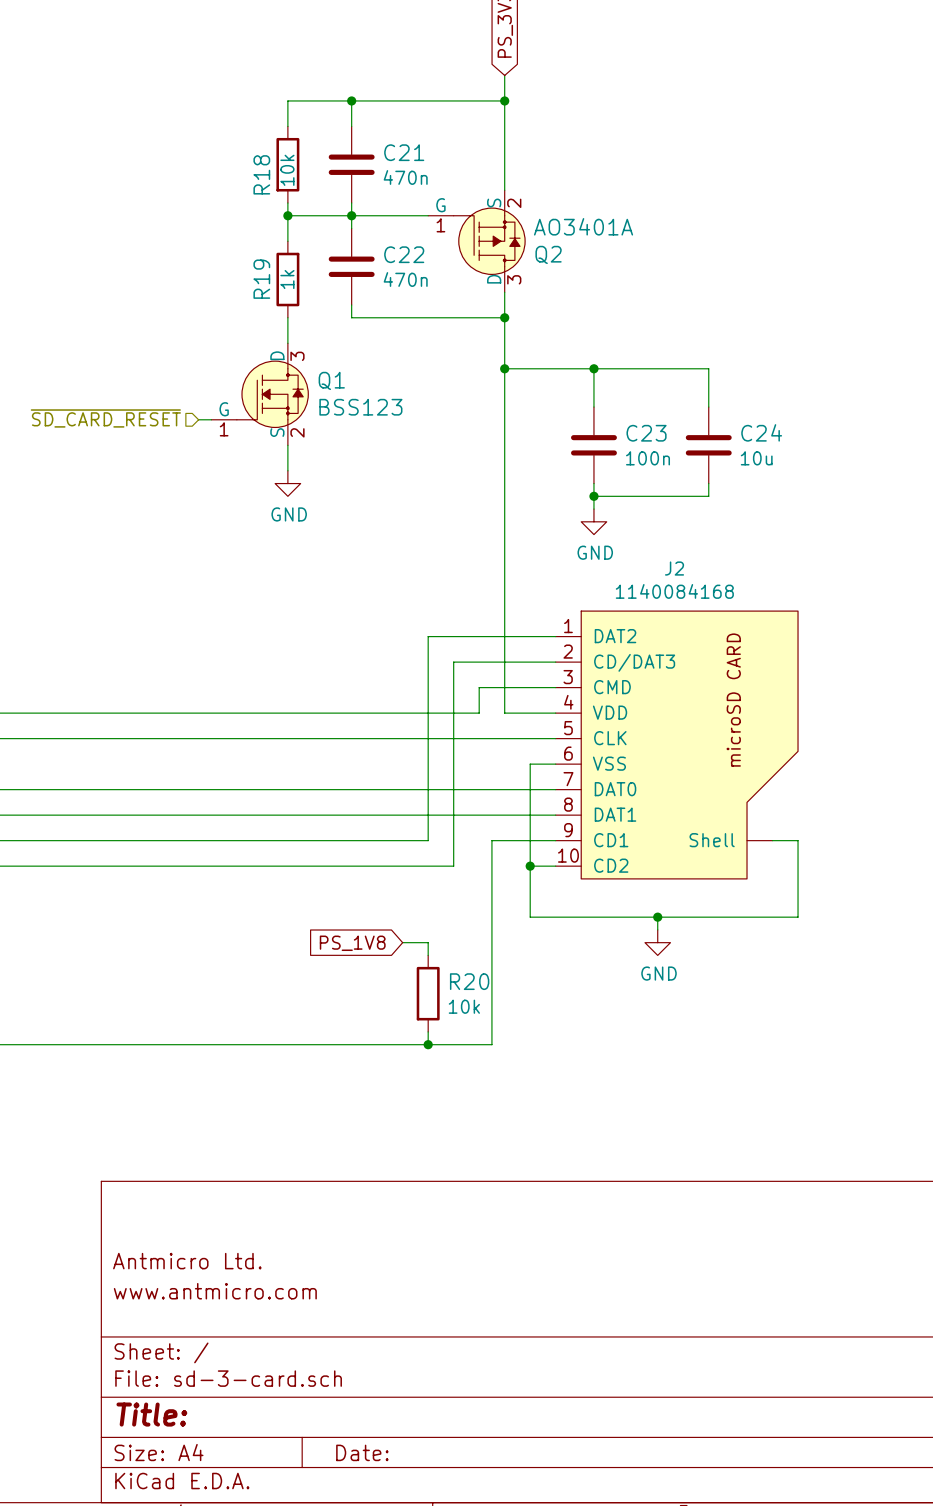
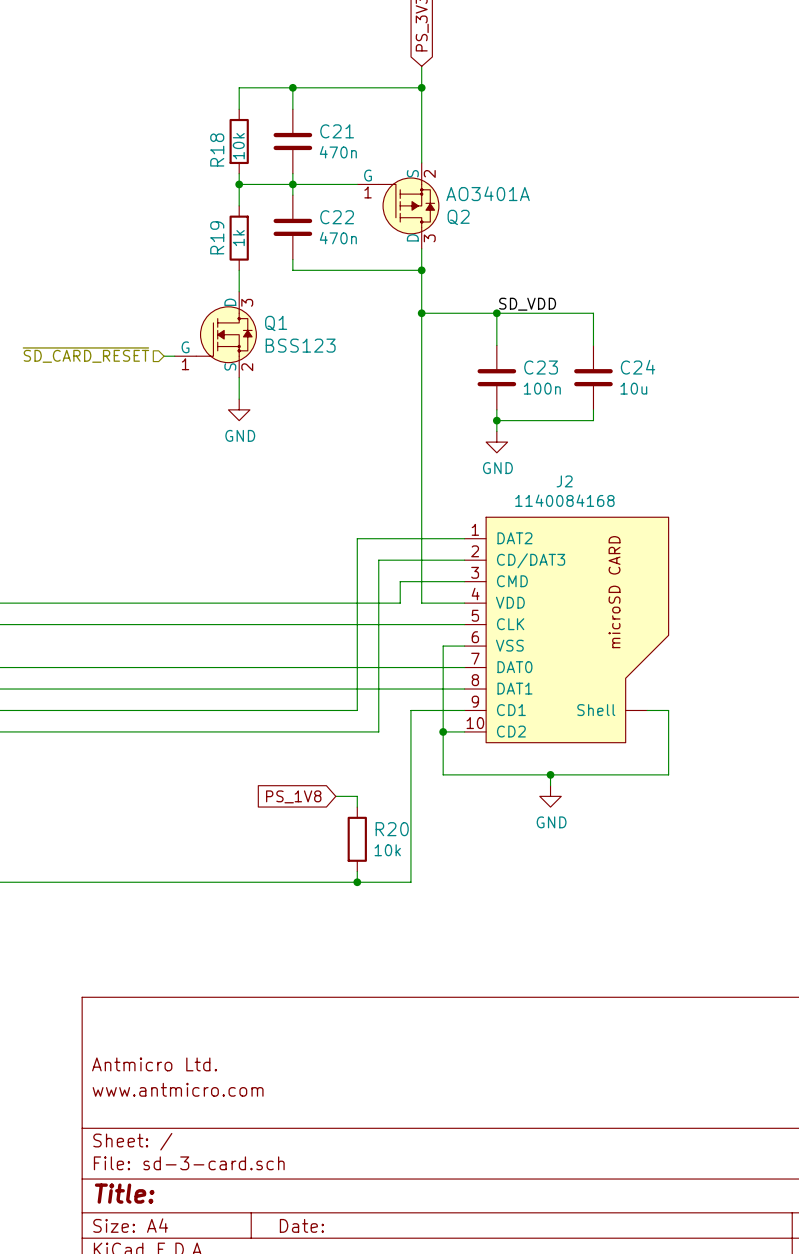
label: none -> SD_VDD (527, 304)

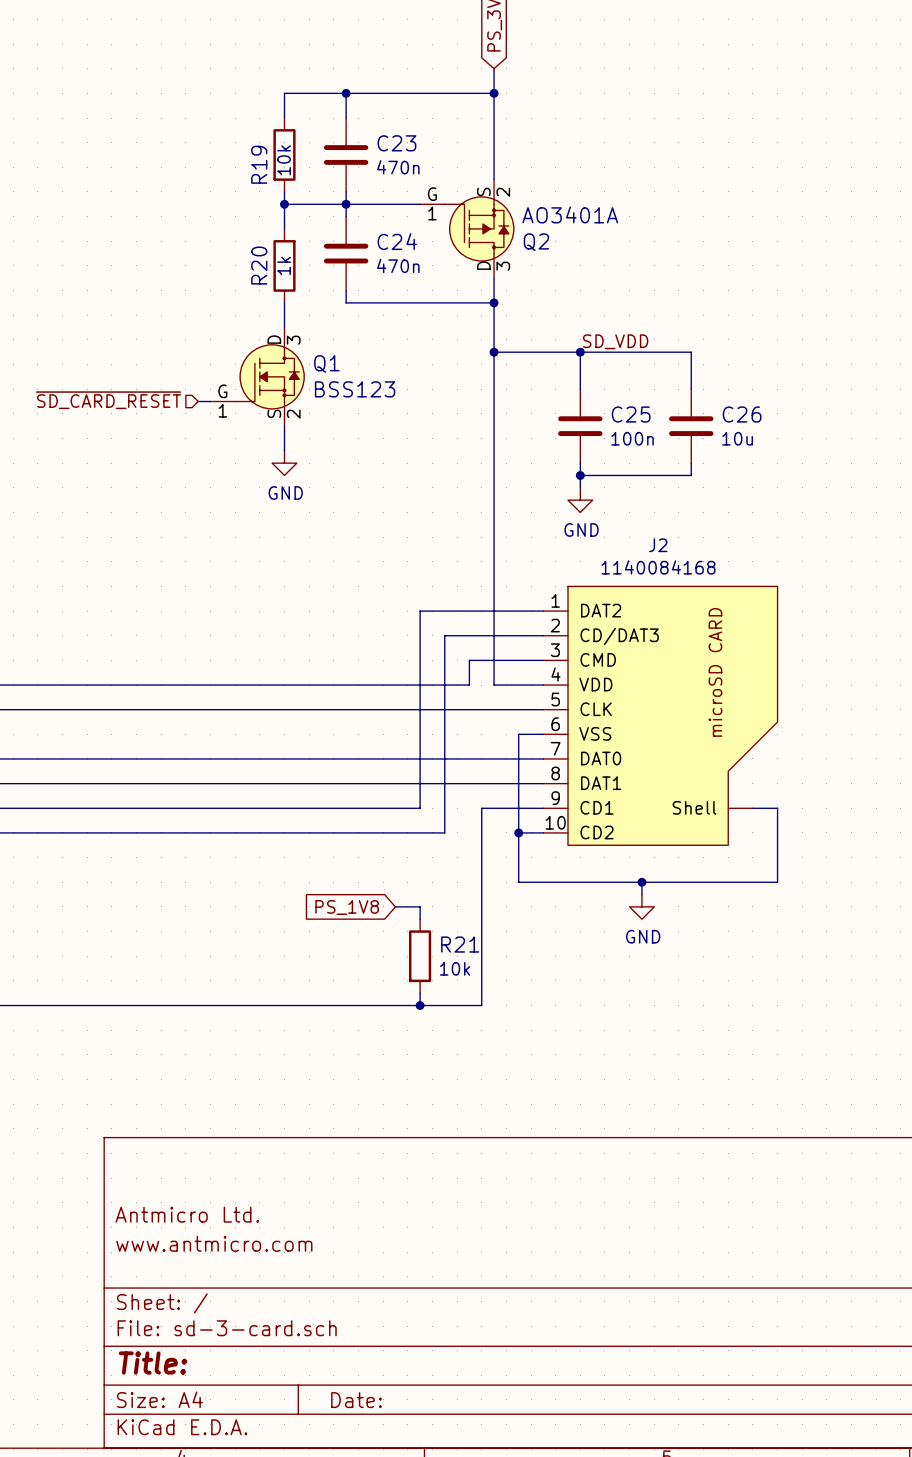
C21 name: C21 (337, 131) -> C23 (396, 143)
R18 name: R18 (217, 150) -> R19 (259, 164)
C22 name: C22 (337, 217) -> C24 (397, 241)
R19 name: R19 (217, 237) -> R20 (259, 265)
C23 name: C23 (541, 367) -> C25 (631, 414)
C24 name: C24 (638, 367) -> C26 (742, 414)
R20 name: R20 (392, 829) -> R21 (460, 944)

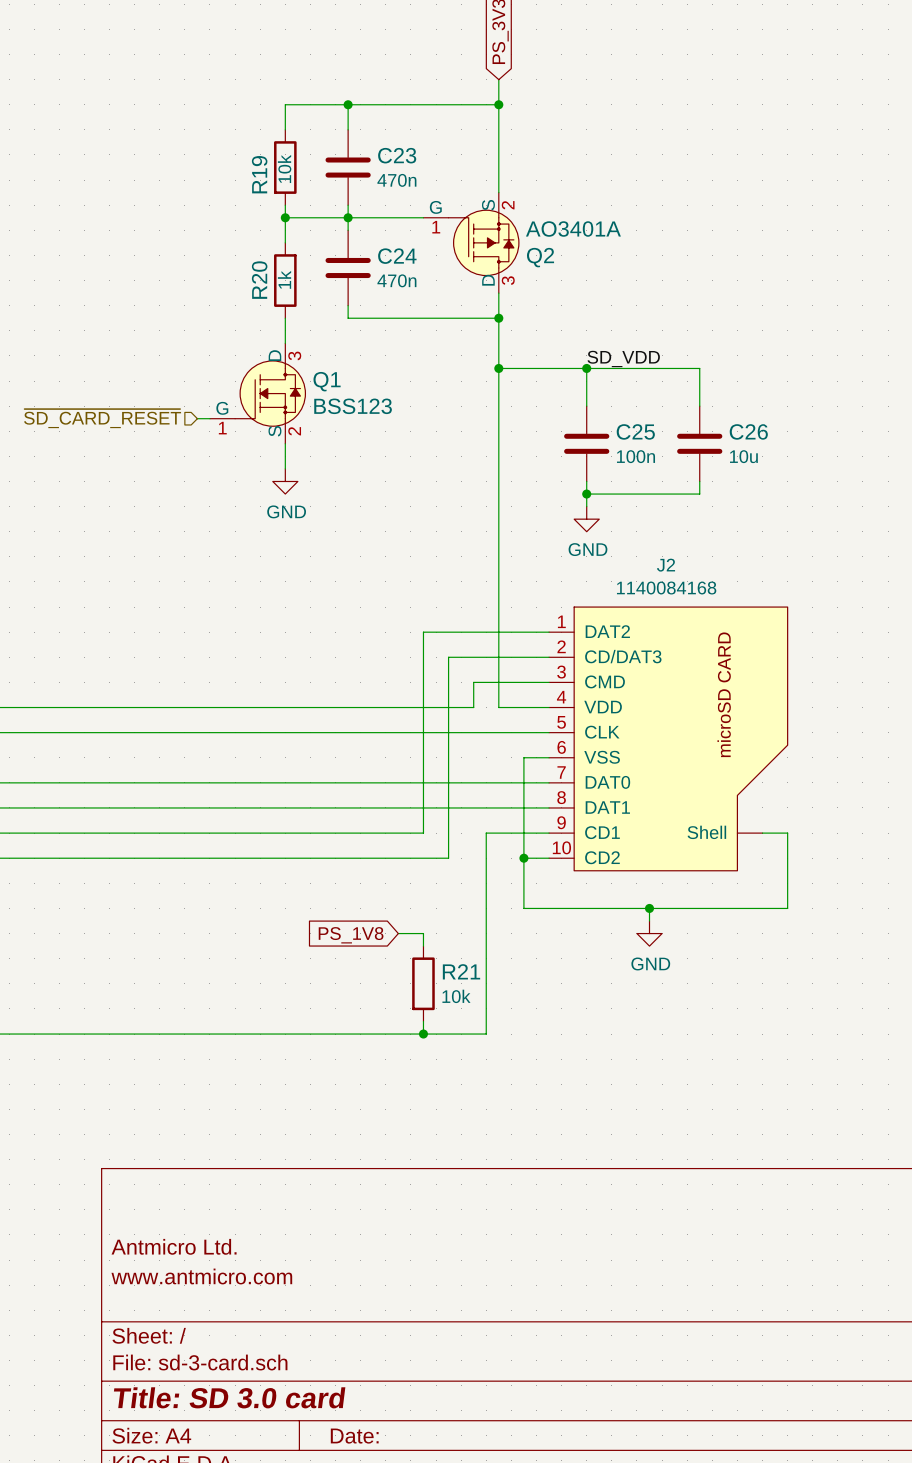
title block: Title: (153, 1363) -> Title: SD 3.0 card (229, 1397)

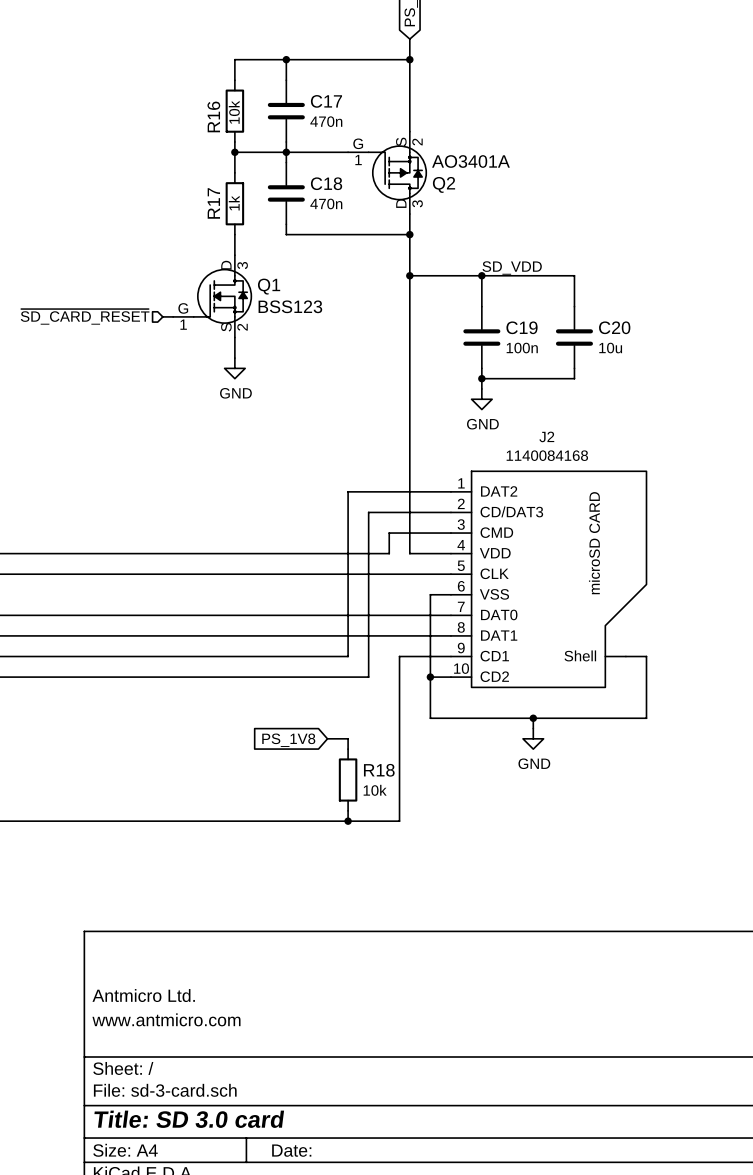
C23 name: C23 (397, 155) -> C17 (326, 101)
R19 name: R19 (259, 174) -> R16 (213, 116)
C24 name: C24 (397, 256) -> C18 (326, 183)
R20 name: R20 (259, 280) -> R17 (213, 203)
C25 name: C25 (635, 431) -> C19 (522, 327)
C26 name: C26 (748, 431) -> C20 (614, 327)
R21 name: R21 (461, 971) -> R18 (379, 770)

